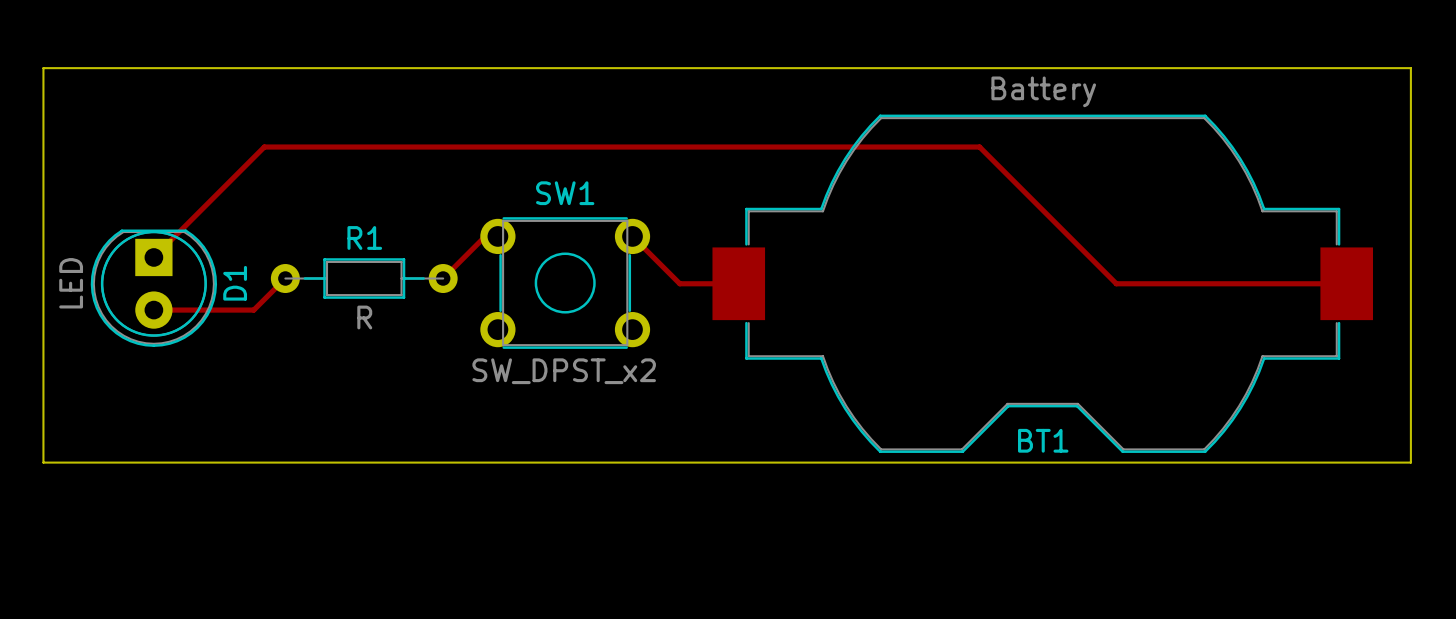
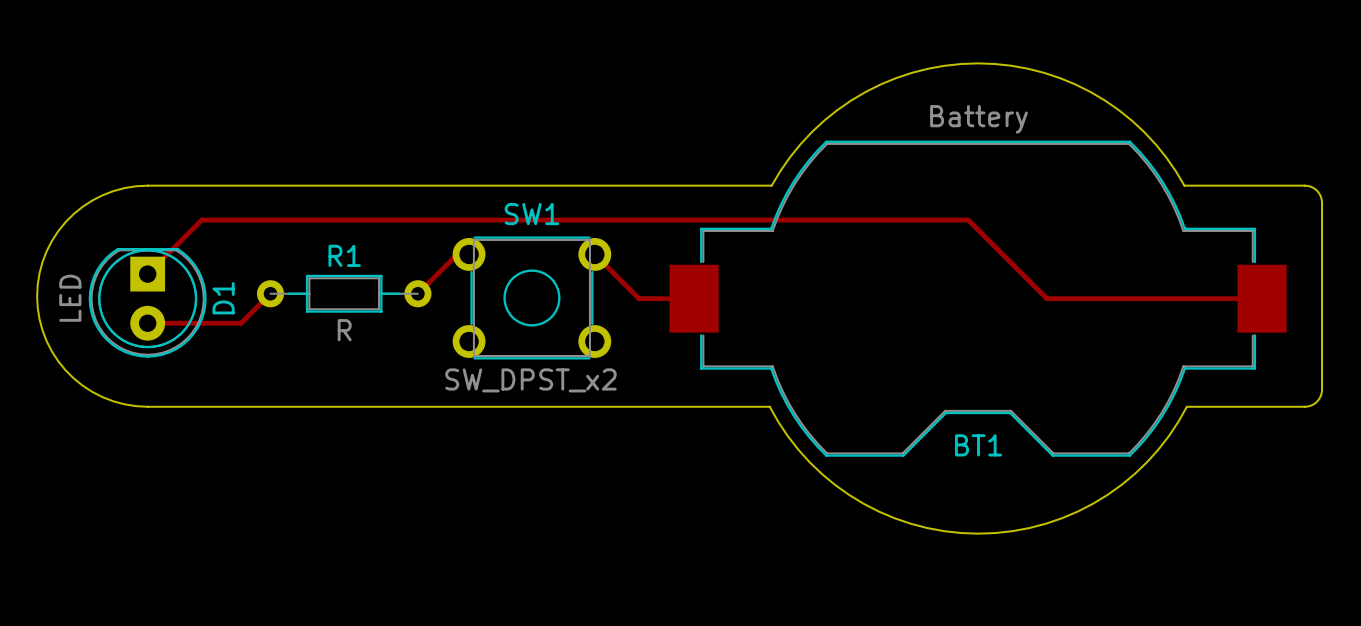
board edge: (1410, 181) (1410, 68) (43, 68) (43, 462) (1410, 462) (1410, 381) -> (1322, 202) (1318, 192) (1306, 185) (1184, 185) (1166, 157) (1144, 132) (1118, 110) (1090, 92) (1060, 78) (1028, 68) (994, 63) (961, 63) (911, 72) (880, 84) (850, 100) (811, 132) (789, 157) (771, 185) (147, 185) (124, 188) (92, 200) (65, 222) (51, 240) (42, 262) (37, 296) (42, 330) (51, 351) (65, 370) (92, 391) (124, 404) (147, 406) (769, 406) (798, 449) (821, 474) (849, 494) (894, 518) (927, 528) (961, 533) (995, 533) (1029, 528) (1062, 518) (1093, 503) (1121, 484) (1147, 462) (1169, 435) (1186, 406) (1306, 406) (1318, 400) (1322, 389)
track: (211, 199) (264, 147) (979, 147) (1032, 199) -> (201, 220) (968, 220)

